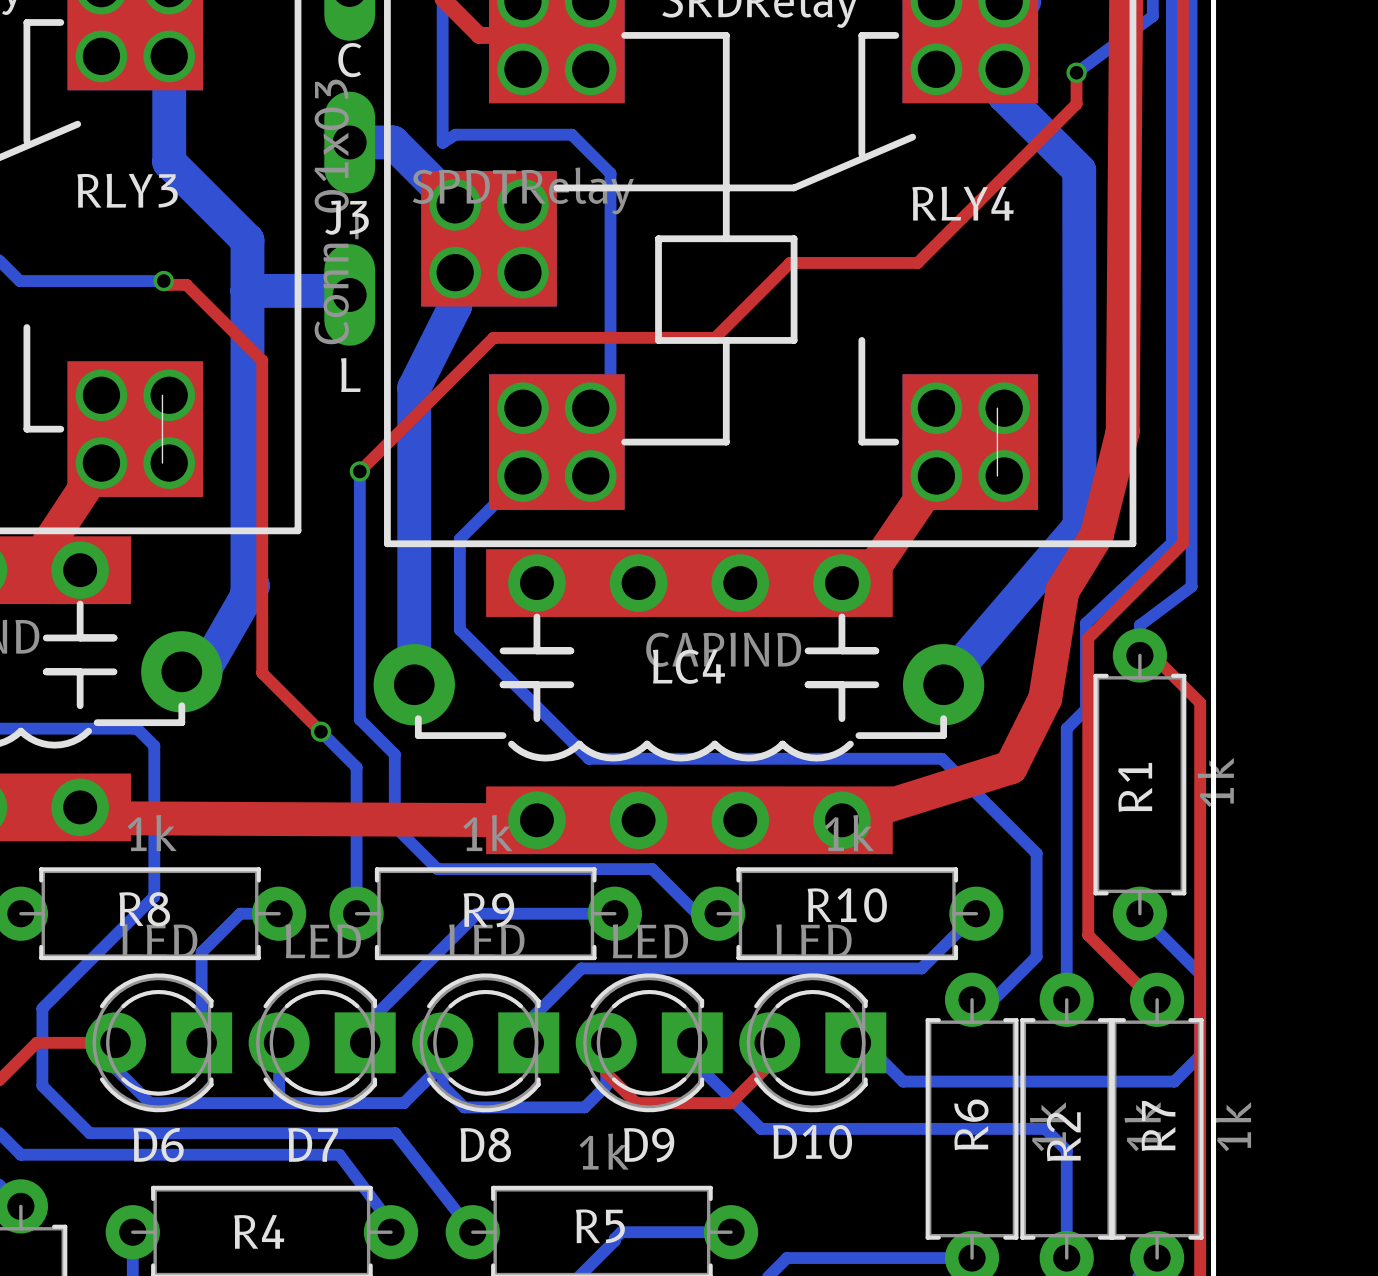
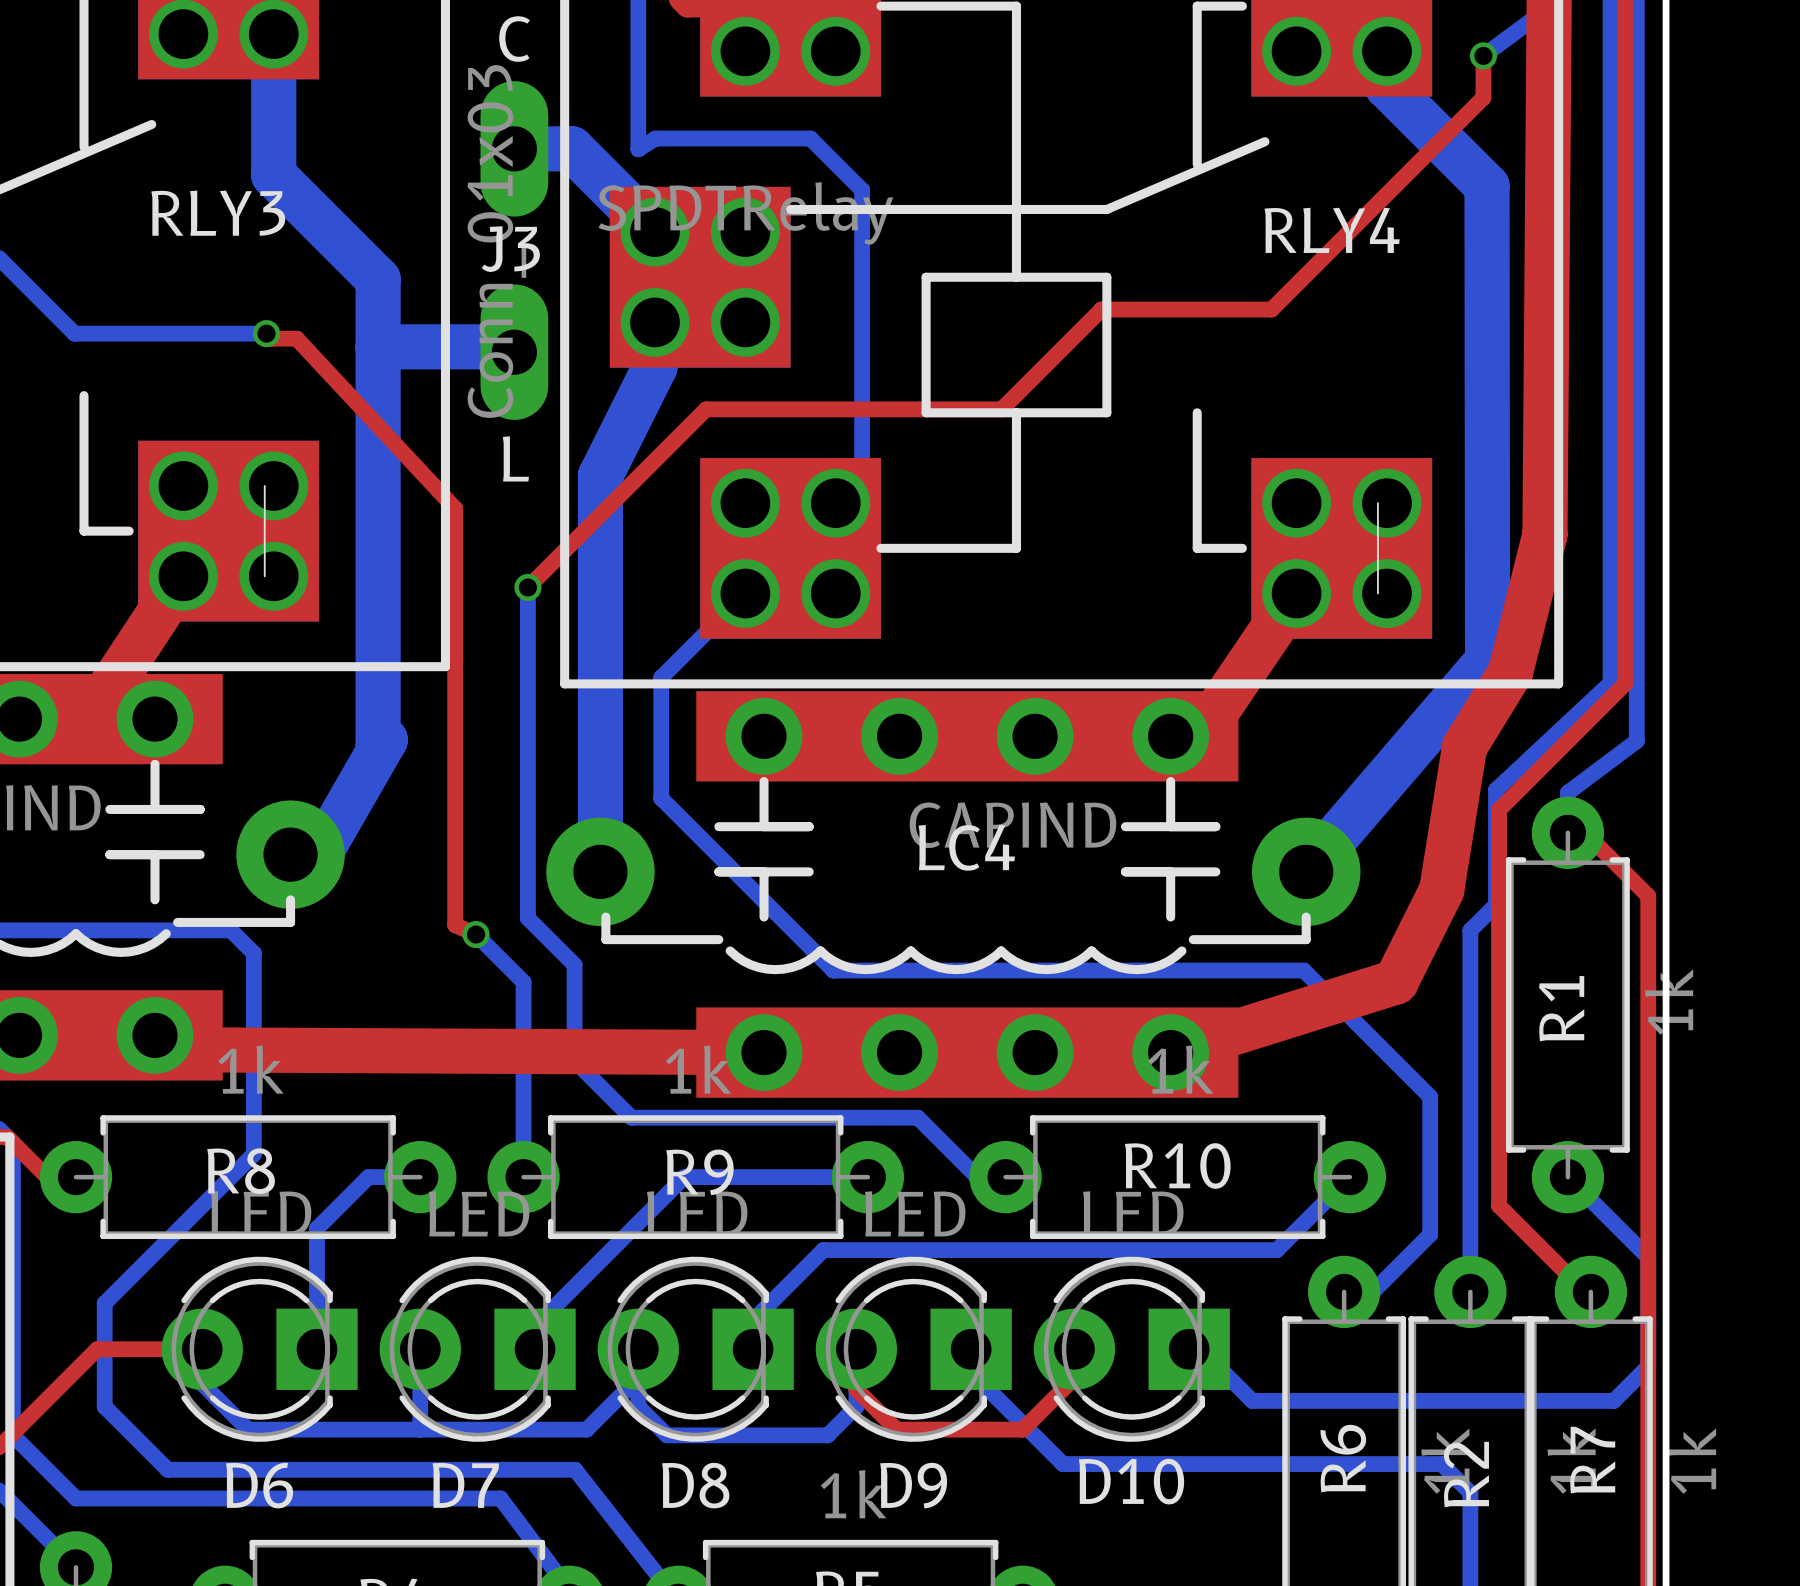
top track: (186, 284) (262, 360) (262, 673) (320, 731) -> (296, 338) (455, 508) (455, 925) (476, 934)

